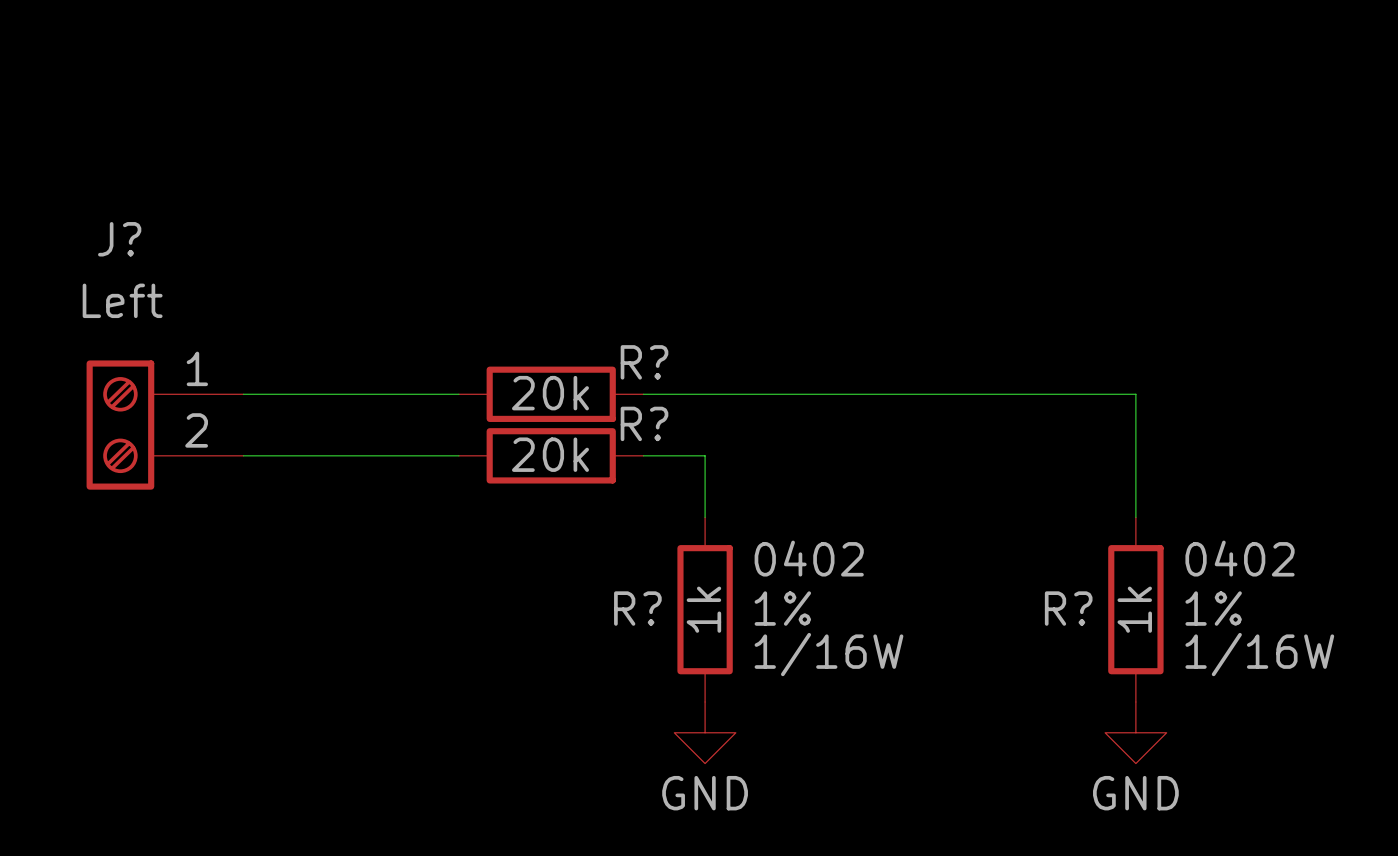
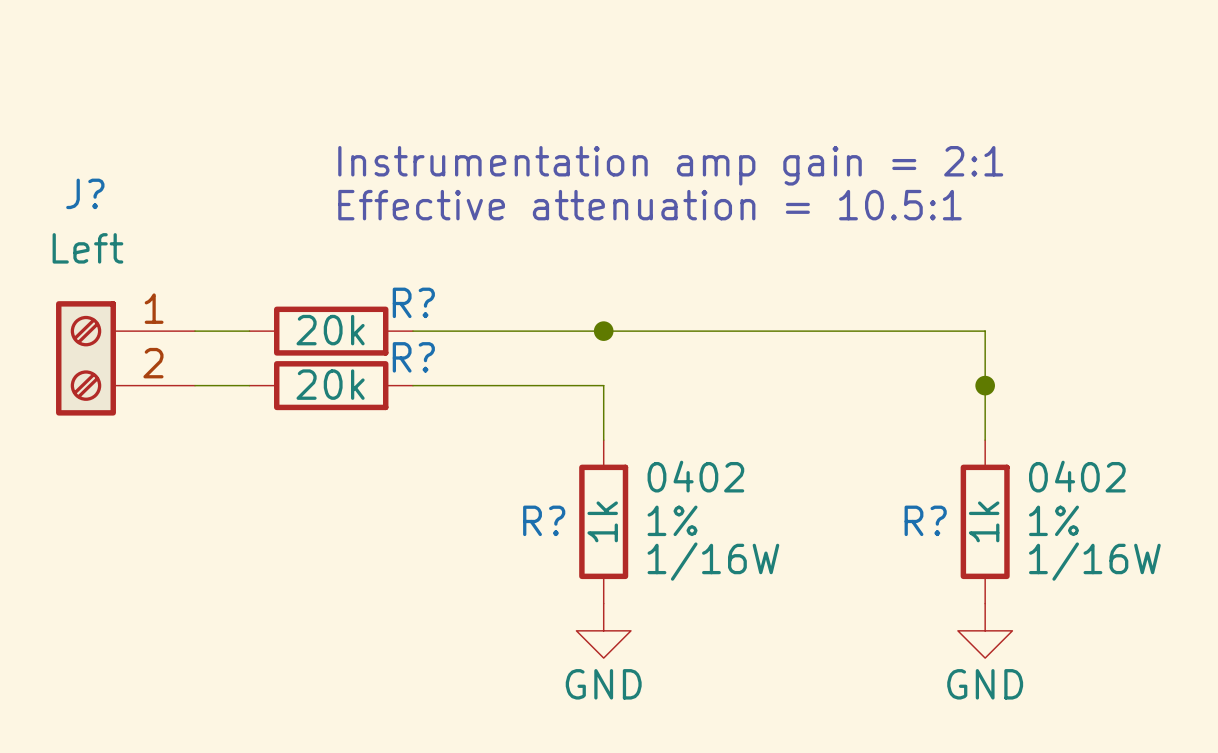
text: none -> Instrumentation amp gain = 2:1 (670, 165)
text: none -> Effective attenuation = 10.5:1 (649, 205)
wire: (305, 394) (458, 394) -> (412, 331) (549, 331)
R?: none -> 20k (331, 331)
R?: 20k (551, 394) -> none
junction: none -> (603, 331)
wire: (305, 455) (458, 455) -> (412, 385) (549, 385)
R?: none -> 20k (331, 385)
R?: 20k (551, 455) -> none
junction: none -> (985, 385)

